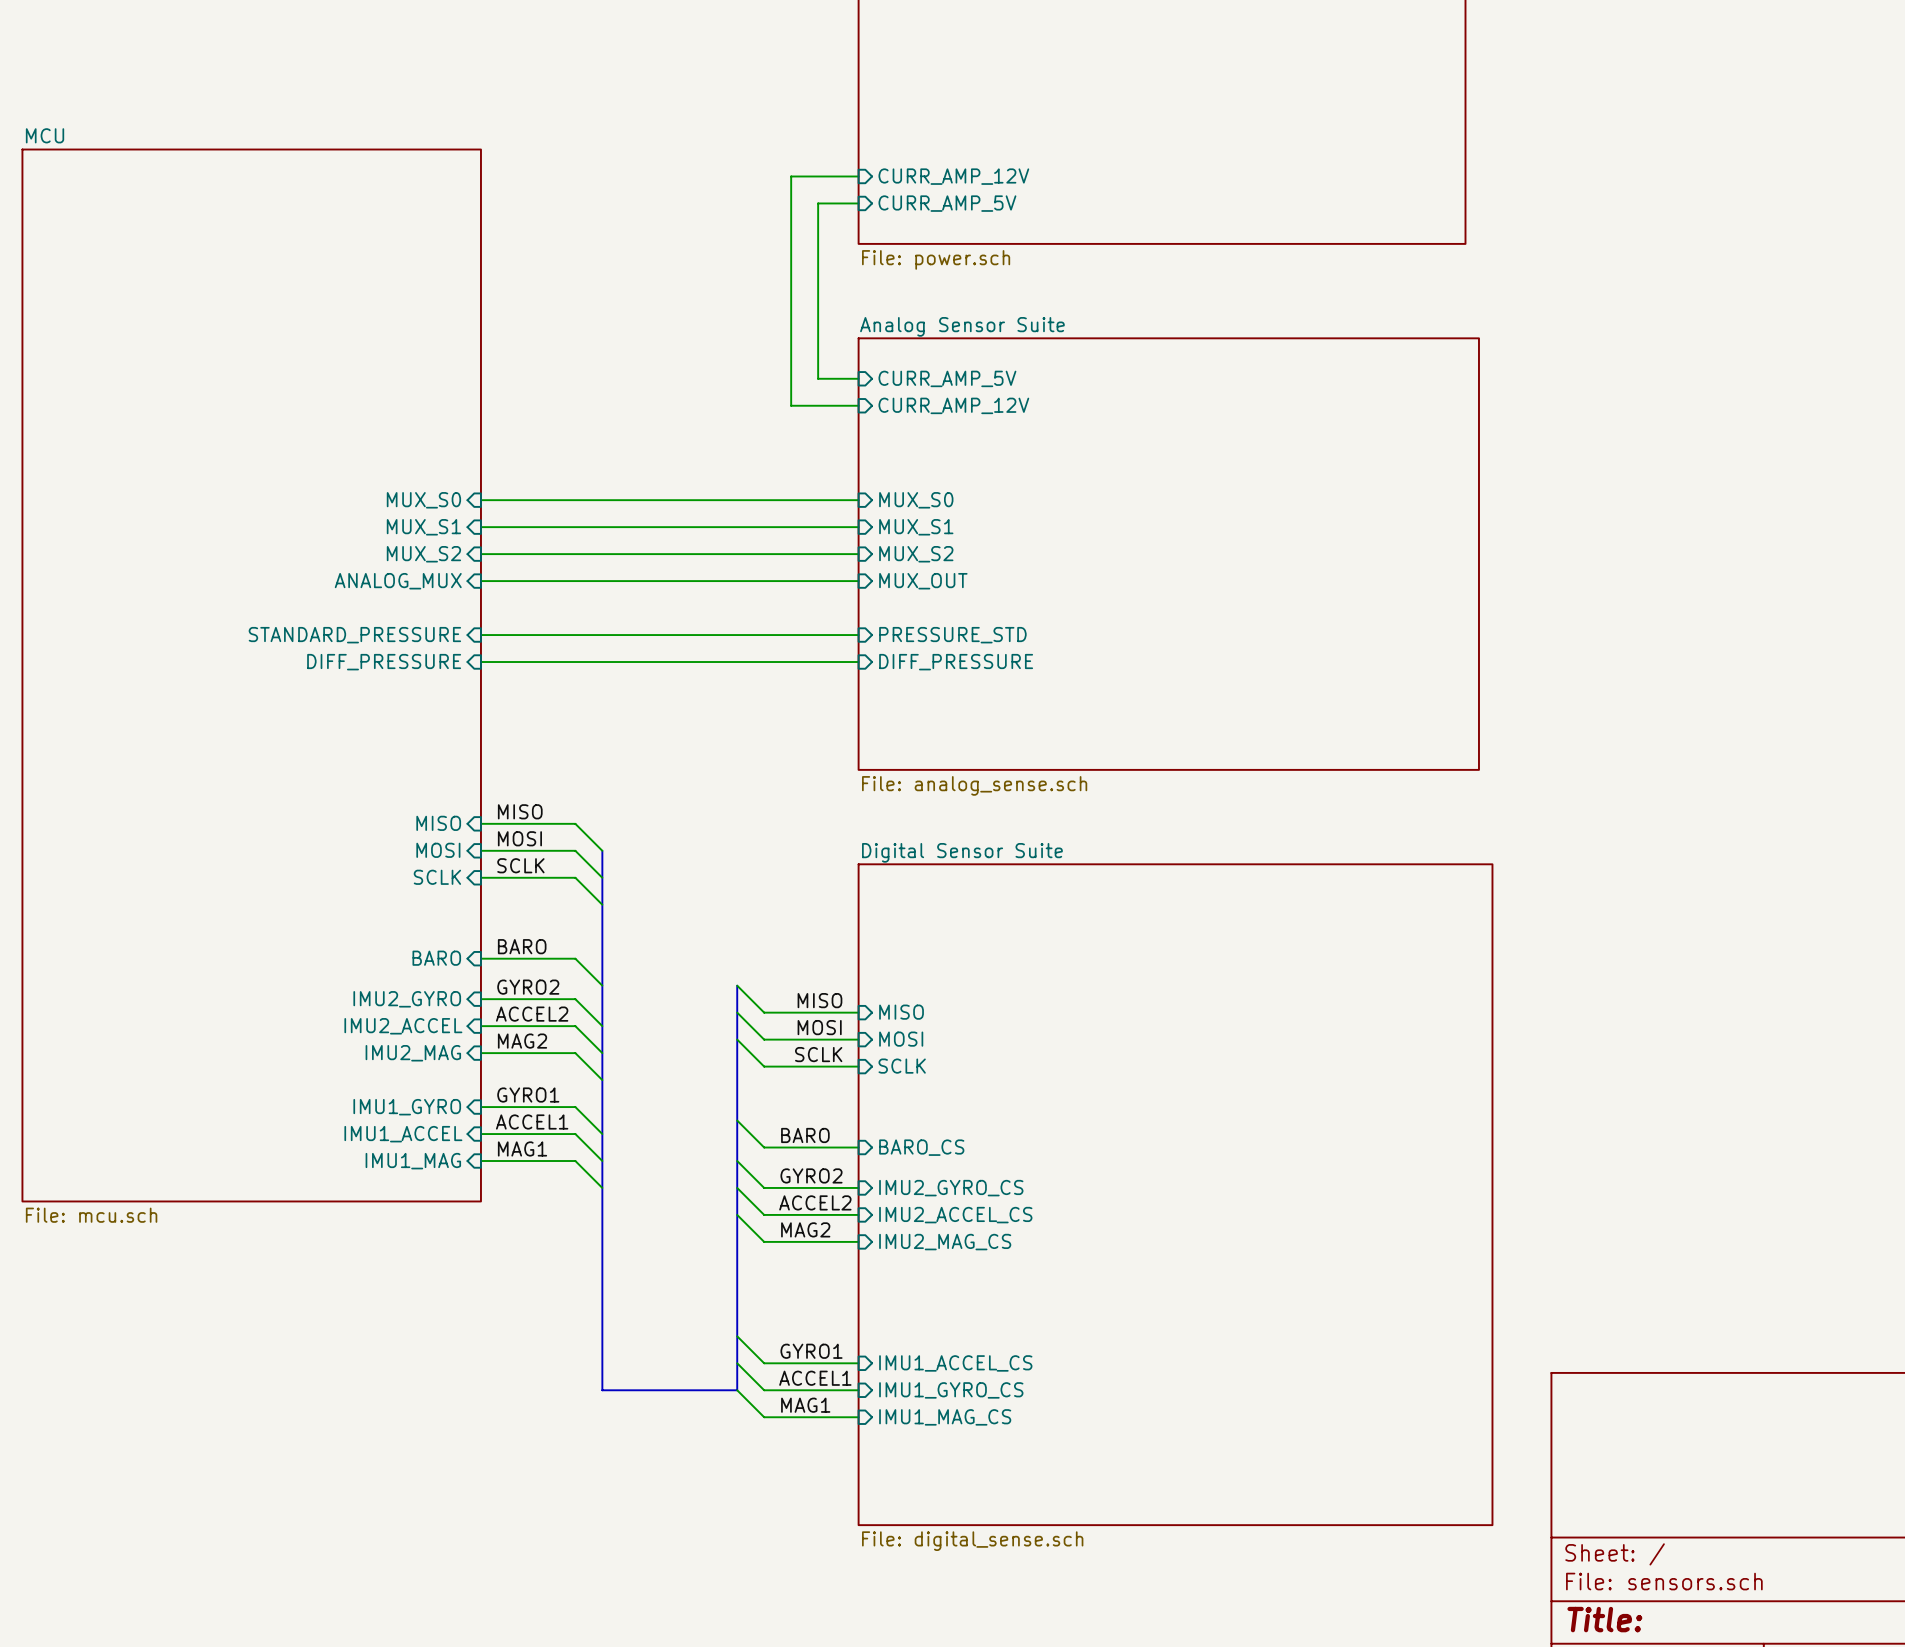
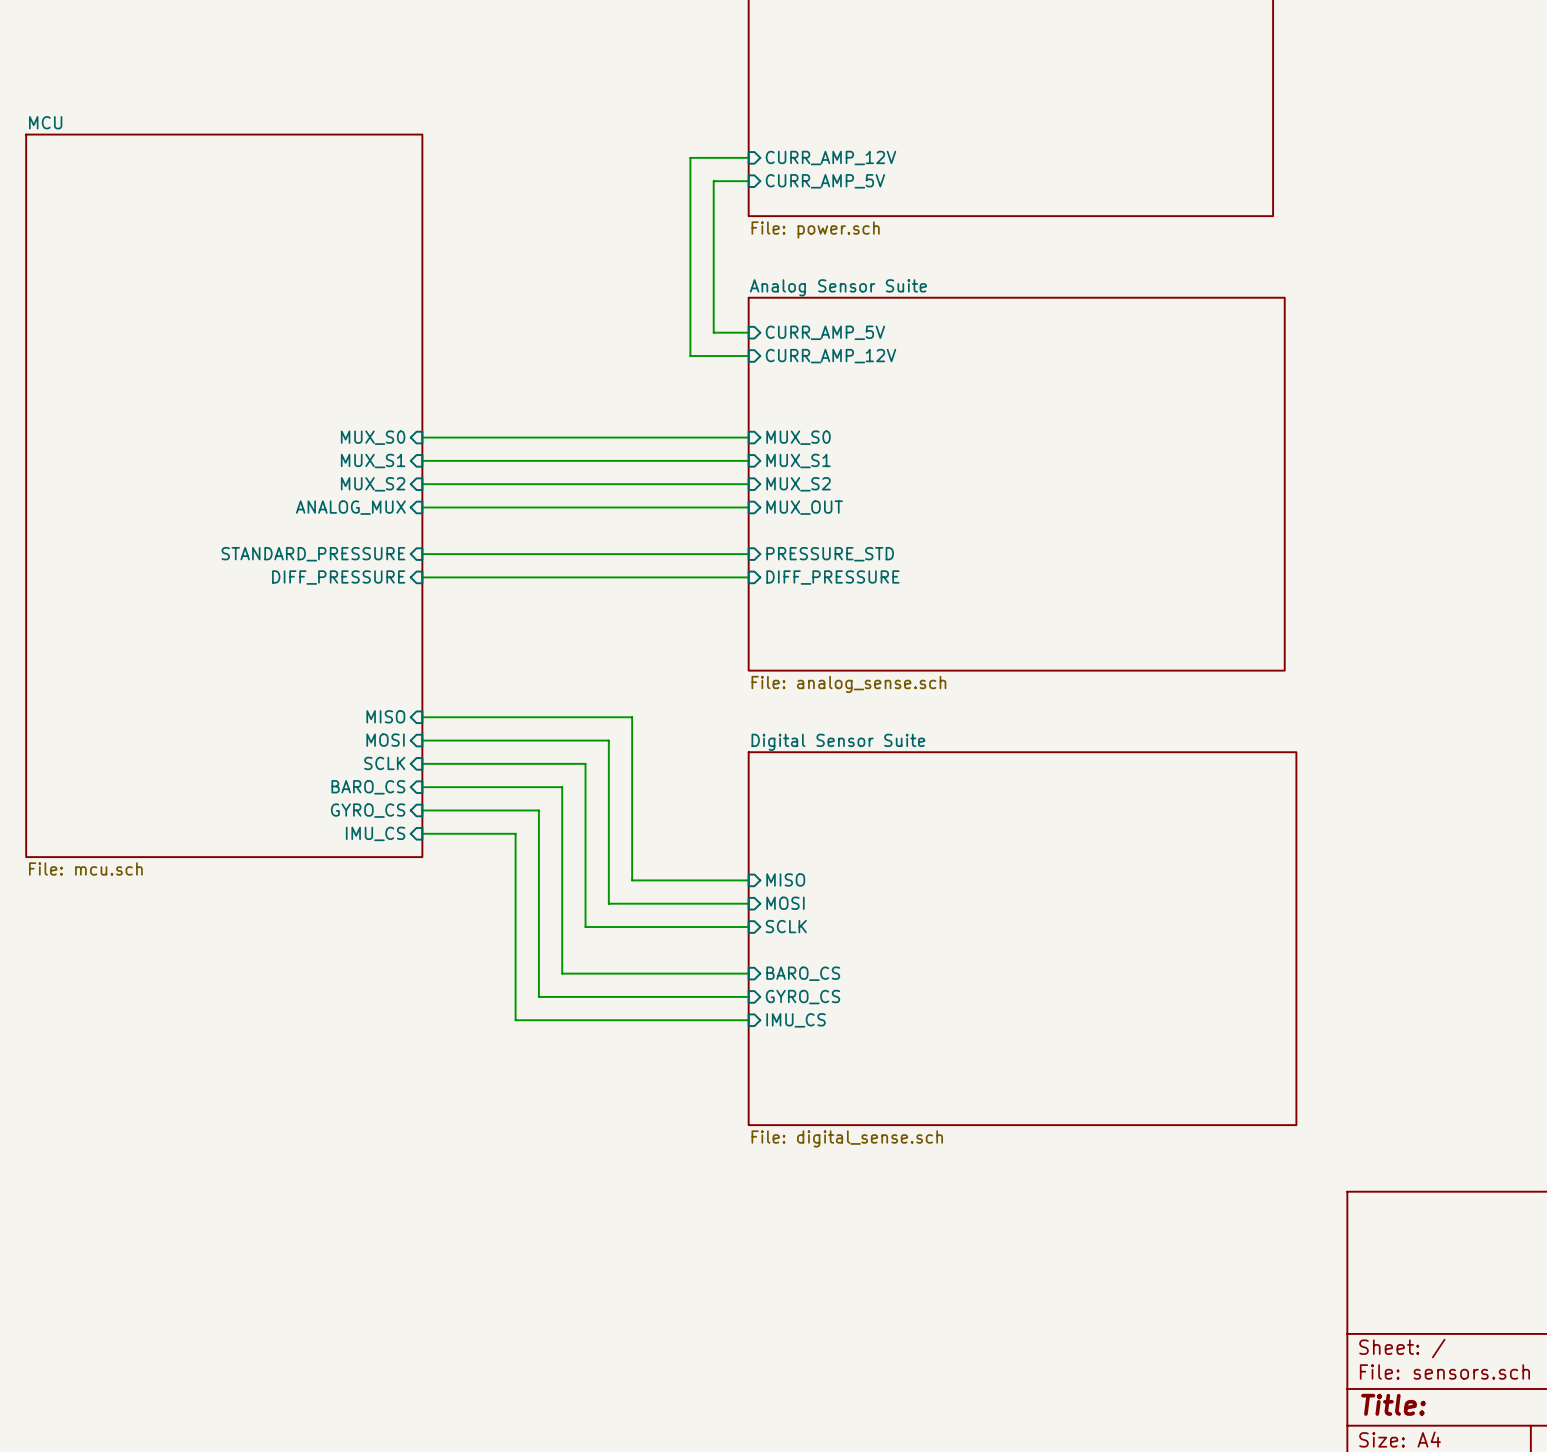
sheet MCU: none -> File: mcu.sch (224, 495)
sheet MCU: File: mcu.sch (251, 675) -> none
label: MISO (520, 811) -> none
wire: (575, 823) (602, 850) -> none
label: MOSI (519, 838) -> none
wire: (575, 850) (602, 877) -> none
bus: (602, 850) (602, 1390) (737, 1390) (737, 985) -> none
label: SCLK (520, 865) -> none
wire: (575, 877) (602, 904) -> (503, 763) (585, 763) (585, 927) (667, 927)
sheet pin: none -> BARO_CS (368, 787)
wire: none -> (422, 787) (562, 787) (562, 973) (748, 973)
sheet pin: none -> GYRO_CS (368, 810)
label: BARO (522, 946) -> none
sheet pin: BARO (436, 958) -> IMU_CS (375, 833)
wire: (575, 958) (602, 985) -> (503, 833) (515, 833) (515, 1020) (748, 1020)
wire: (737, 985) (764, 1012) -> (503, 717) (632, 717) (632, 880) (667, 880)
label: GYRO2 (528, 987) -> none
sheet pin: IMU2_GYRO (407, 999) -> none
wire: (480, 999) (575, 999) (602, 1026) -> none
label: MISO (819, 1000) -> none
wire: (737, 1012) (764, 1039) -> (503, 740) (608, 740) (608, 903) (667, 903)
label: ACCEL2 (532, 1014) -> none
sheet pin: IMU2_ACCEL (403, 1026) -> none
wire: (480, 1026) (575, 1026) (602, 1053) -> none
label: MOSI (819, 1027) -> none
wire: (737, 1039) (764, 1066) -> none
label: MAG2 (522, 1041) -> none
sheet pin: IMU2_MAG (413, 1053) -> none
wire: (480, 1053) (575, 1053) (602, 1080) -> none
label: SCLK (818, 1054) -> none
sheet Digital Sensor Suite: none -> File: digital_sense.sch (1022, 938)
label: GYRO1 (528, 1095) -> none
sheet pin: IMU1_GYRO (407, 1107) -> none
wire: (480, 1107) (575, 1107) (602, 1134) -> none
wire: (737, 1120) (764, 1147) -> (422, 810) (538, 810) (538, 996) (667, 996)
sheet pin: none -> BARO_CS (803, 973)
label: ACCEL1 (532, 1121) -> none
sheet pin: IMU1_ACCEL (403, 1134) -> none
wire: (480, 1134) (575, 1134) (602, 1161) -> none
label: BARO (805, 1135) -> none
sheet pin: BARO_CS (921, 1147) -> GYRO_CS (802, 997)
label: MAG1 (522, 1148) -> none
sheet pin: IMU1_MAG (413, 1161) -> none
wire: (480, 1161) (575, 1161) (602, 1187) -> none
wire: (737, 1161) (764, 1187) (858, 1187) -> none
label: GYRO2 (811, 1175) -> none
wire: (737, 1187) (764, 1214) (858, 1214) -> none
sheet pin: IMU2_GYRO_CS (951, 1188) -> IMU_CS (796, 1020)
sheet Digital Sensor Suite: File: digital_sense.sch (1175, 1194) -> none
label: ACCEL2 (815, 1202) -> none
wire: (737, 1214) (764, 1241) (858, 1241) -> none
sheet pin: IMU2_ACCEL_CS (955, 1215) -> none
label: MAG2 (805, 1229) -> none
sheet pin: IMU2_MAG_CS (945, 1242) -> none
wire: (737, 1336) (764, 1363) (858, 1363) -> none
label: GYRO1 (811, 1351) -> none
wire: (737, 1363) (764, 1390) (858, 1390) -> none
sheet pin: IMU1_ACCEL_CS (955, 1363) -> none
label: ACCEL1 (815, 1378) -> none
wire: (737, 1390) (764, 1417) (858, 1417) -> none
sheet pin: IMU1_GYRO_CS (951, 1390) -> none
label: MAG1 (805, 1405) -> none
sheet pin: IMU1_MAG_CS (945, 1417) -> none

